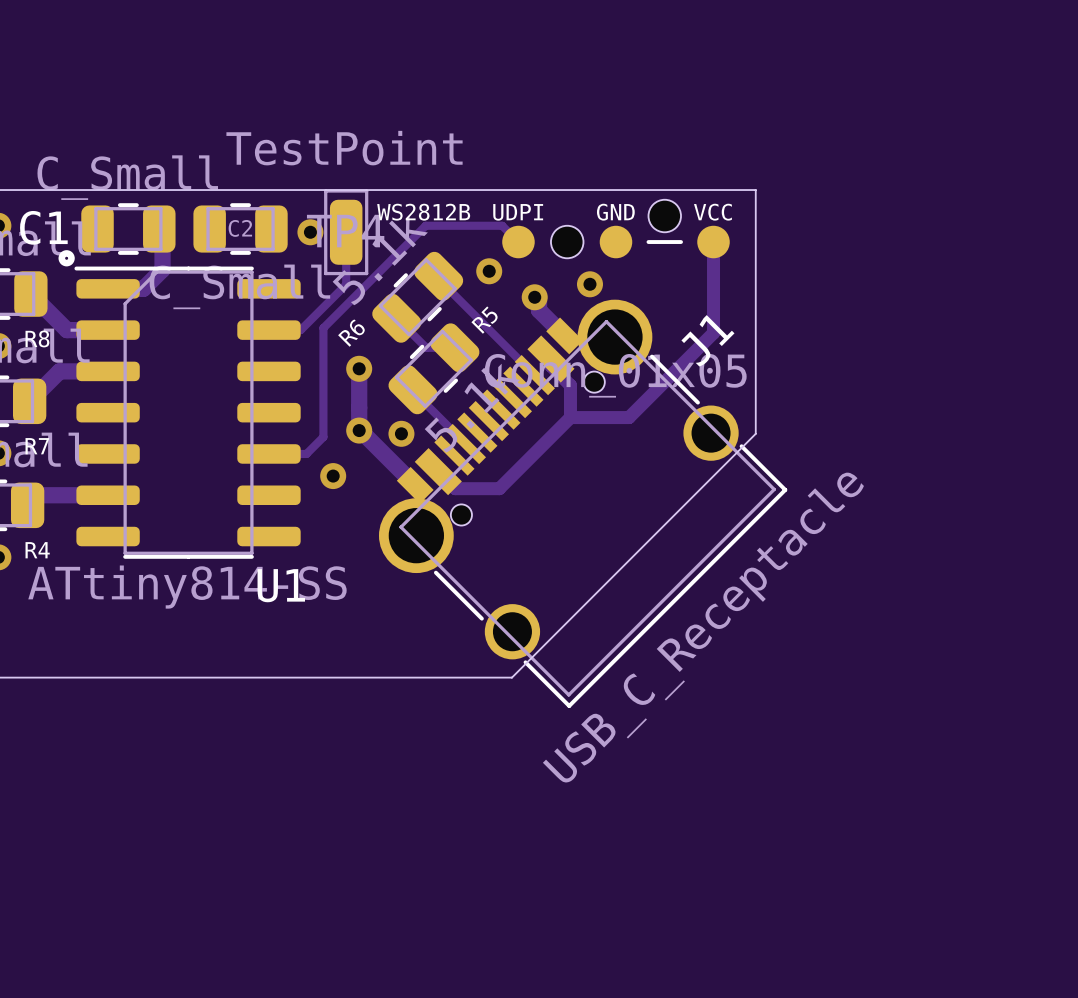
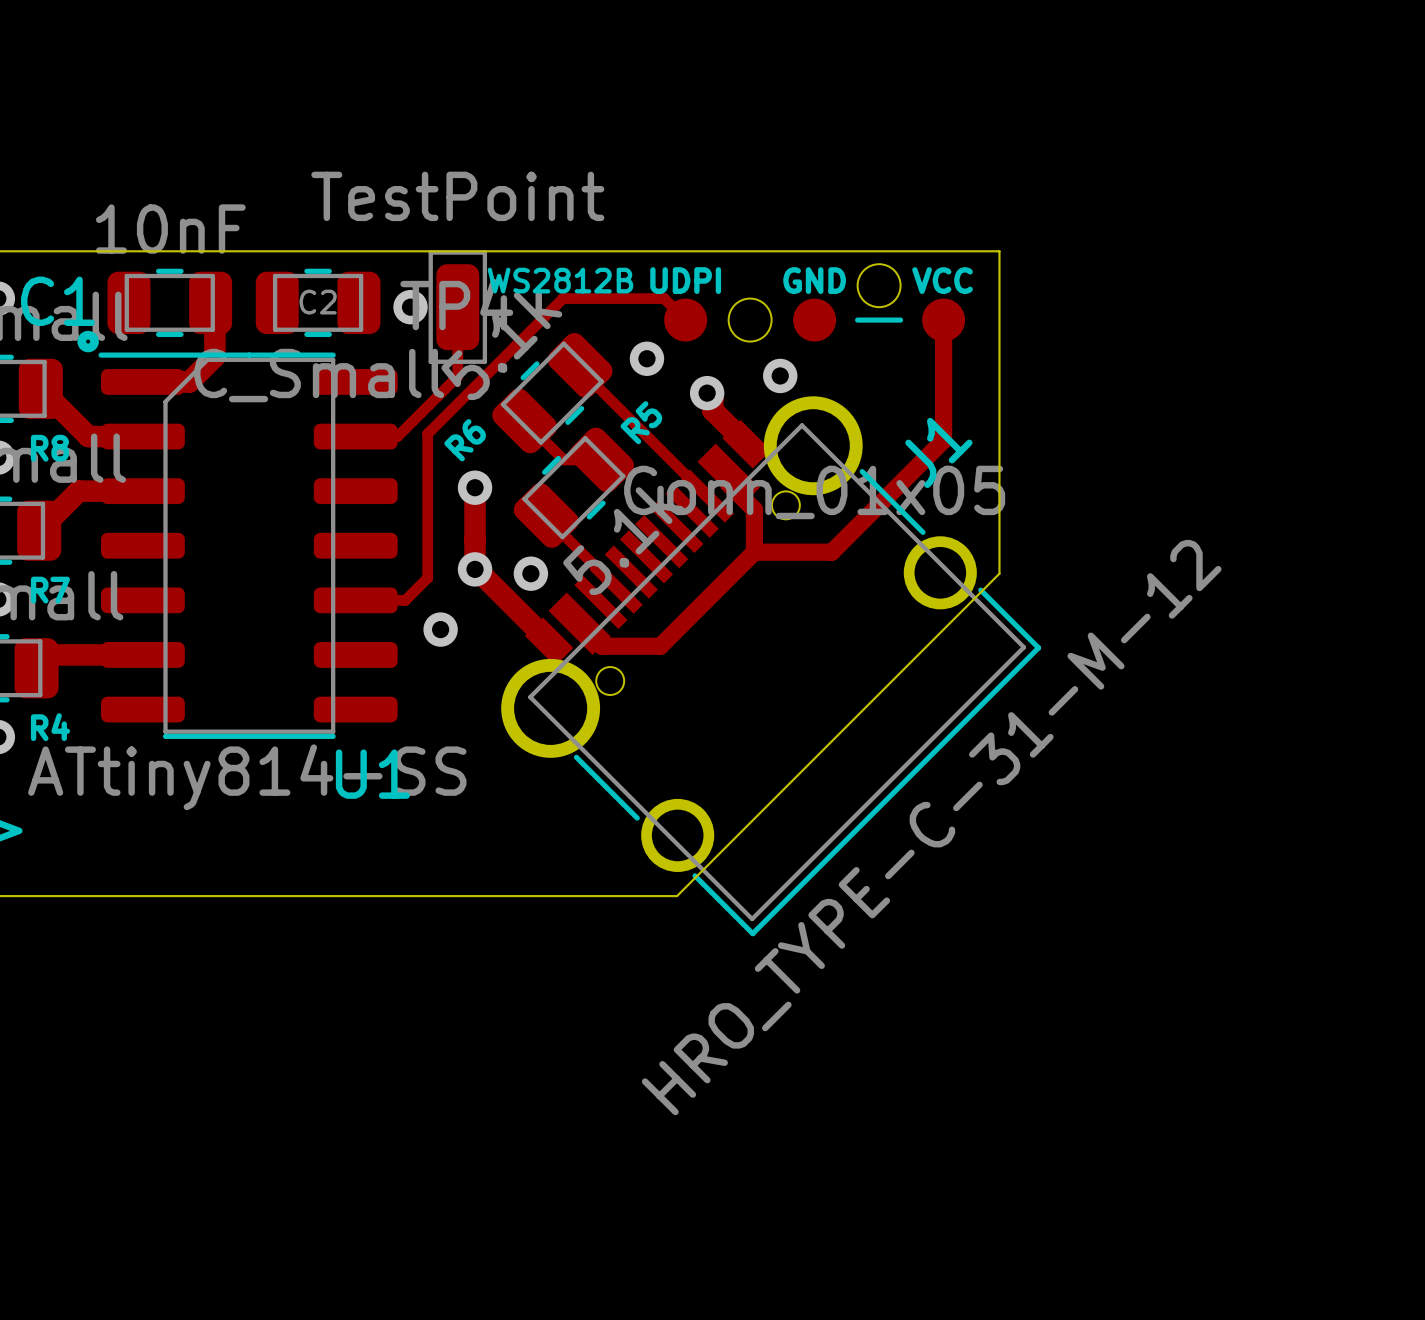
C1 value: C_Small (127, 177) -> 10nF (170, 229)
J1 value: USB_C_Receptacle (703, 627) -> HRO_TYPE-C-31-M-12 (931, 827)

